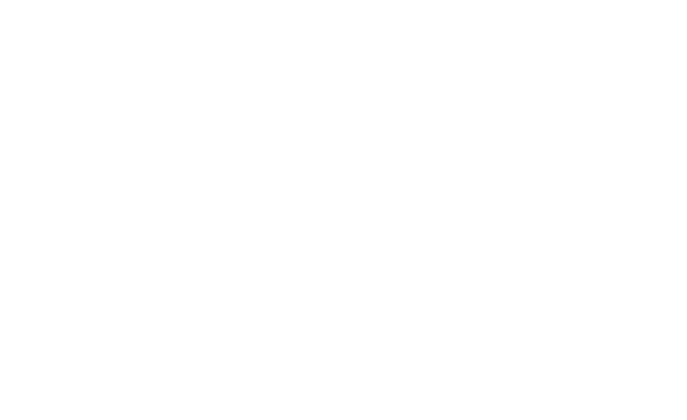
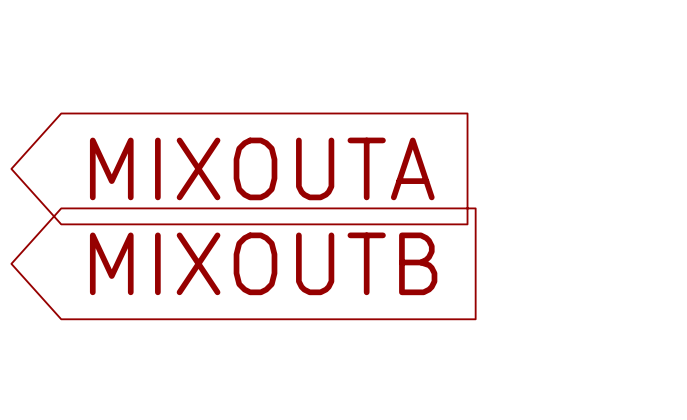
global label: none -> MIXOUTA (262, 168)
global label: none -> MIXOUTB (263, 263)

